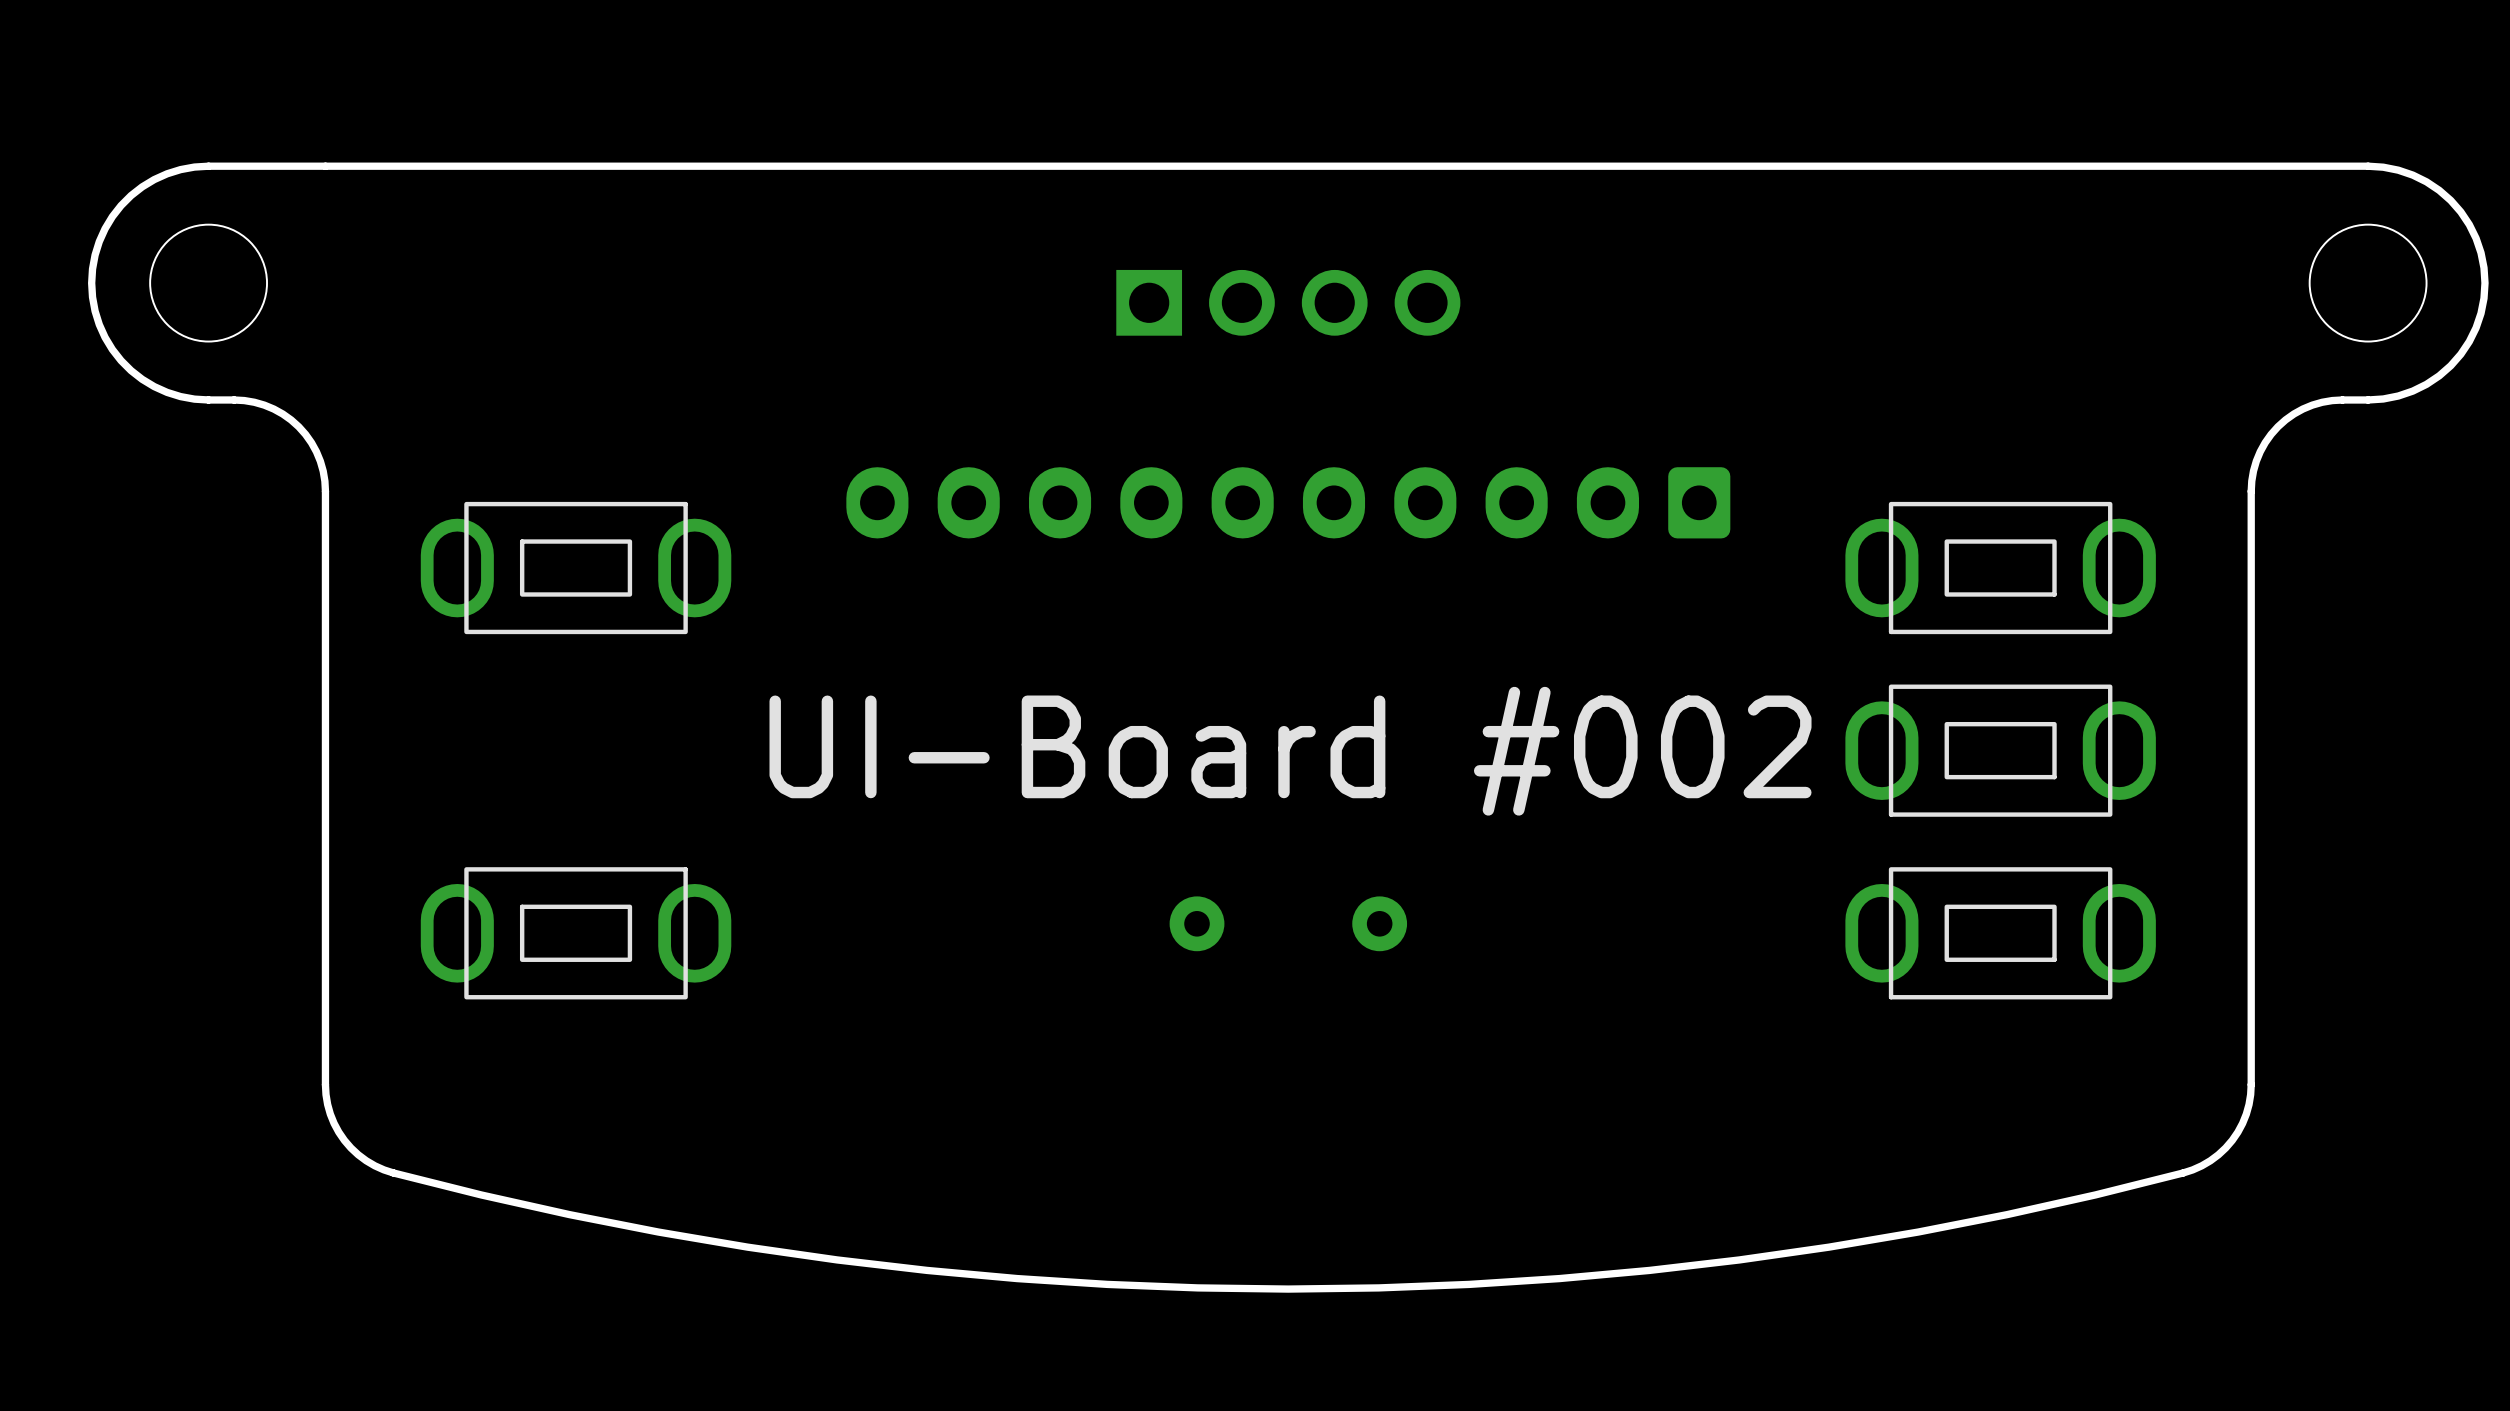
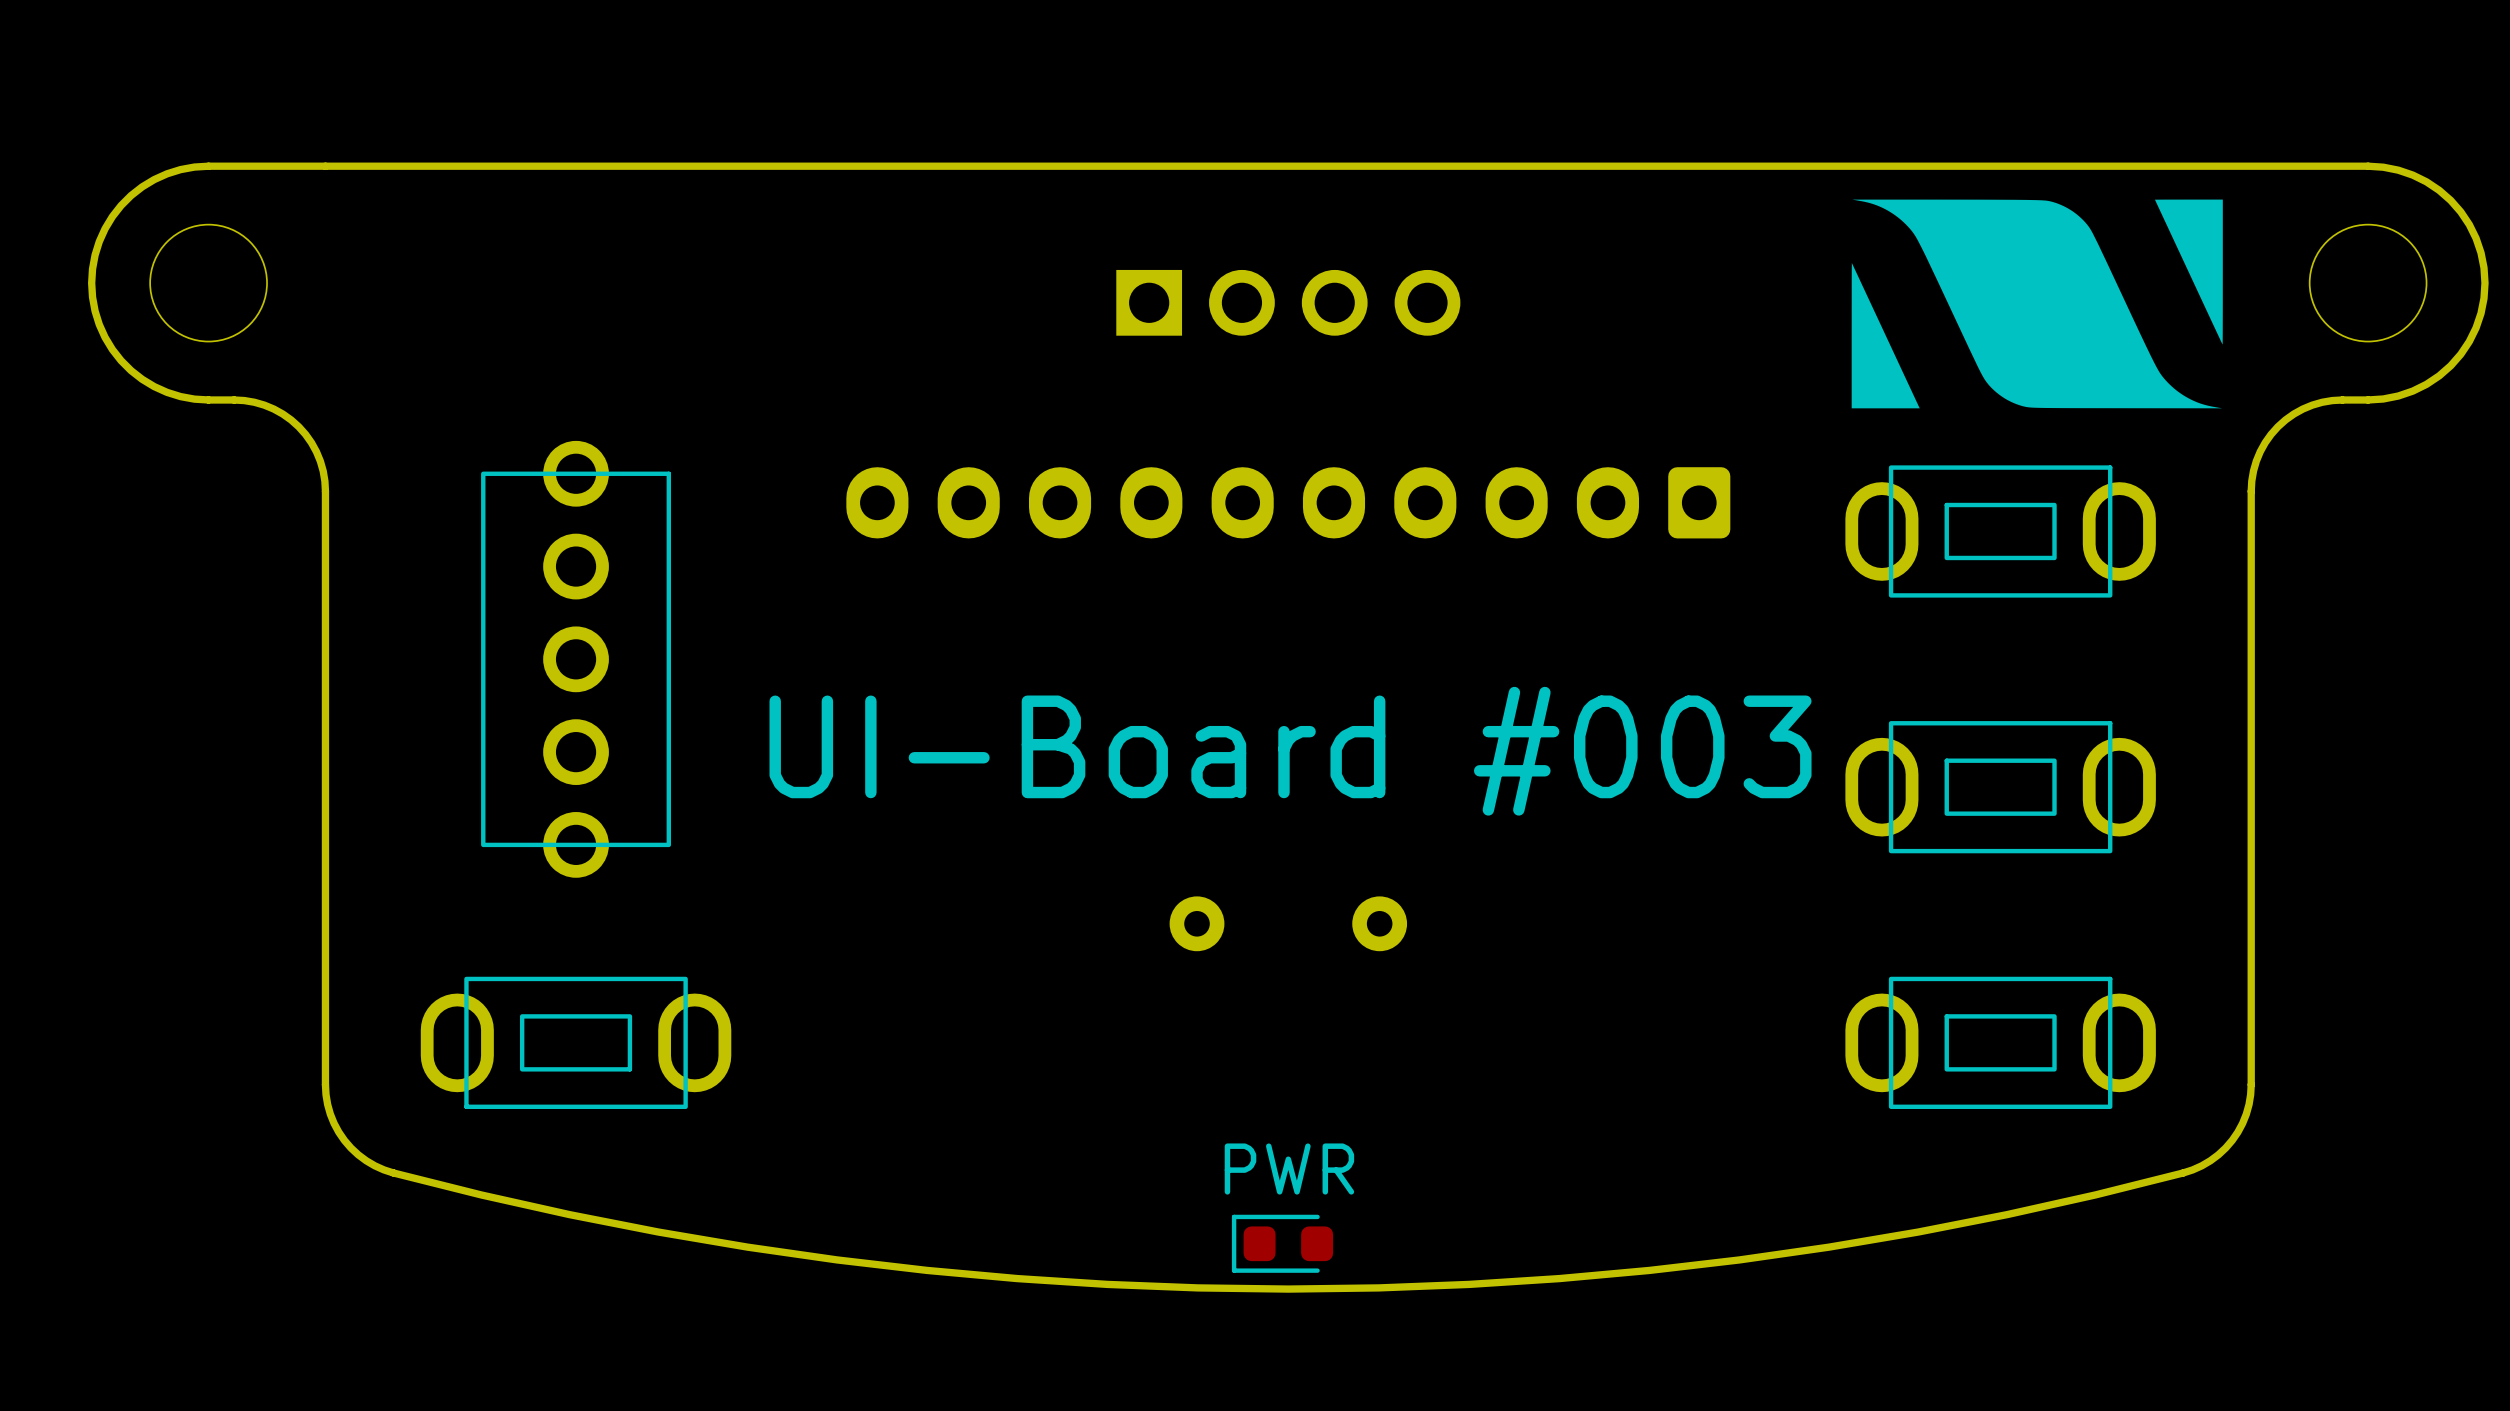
drawing: none -> [1851, 199, 2223, 409]
part: (576, 568) -> none
part position: (2000, 568) -> (2000, 531)
part: none -> (576, 659)
part position: (2000, 750) -> (2000, 787)
text: UI-Board #002 (1290, 751) -> UI-Board #003 (1290, 751)
part position: (576, 933) -> (576, 1042)
part position: (2000, 933) -> (2000, 1042)
text: none -> PWR (1289, 1169)
part: none -> (1282, 1243)

